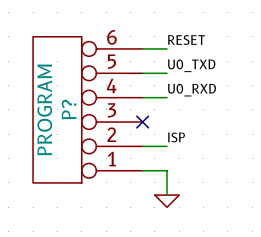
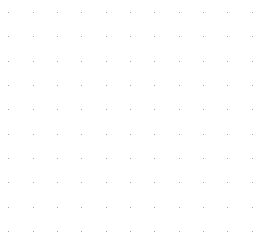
label: RESET (186, 40) -> none
wire: (142, 48) (167, 48) -> none
label: U0_TXD (191, 65) -> none
wire: (142, 73) (167, 73) -> none
label: U0_RXD (191, 90) -> none
wire: (142, 97) (167, 97) -> none
P?: PROGRAM (87, 109) -> none
no-connect mark: (142, 122) -> none
label: ISP (176, 137) -> none
wire: (142, 146) (167, 146) -> none
wire: (142, 170) (167, 170) (167, 195) -> none
power symbol: (167, 201) -> none

